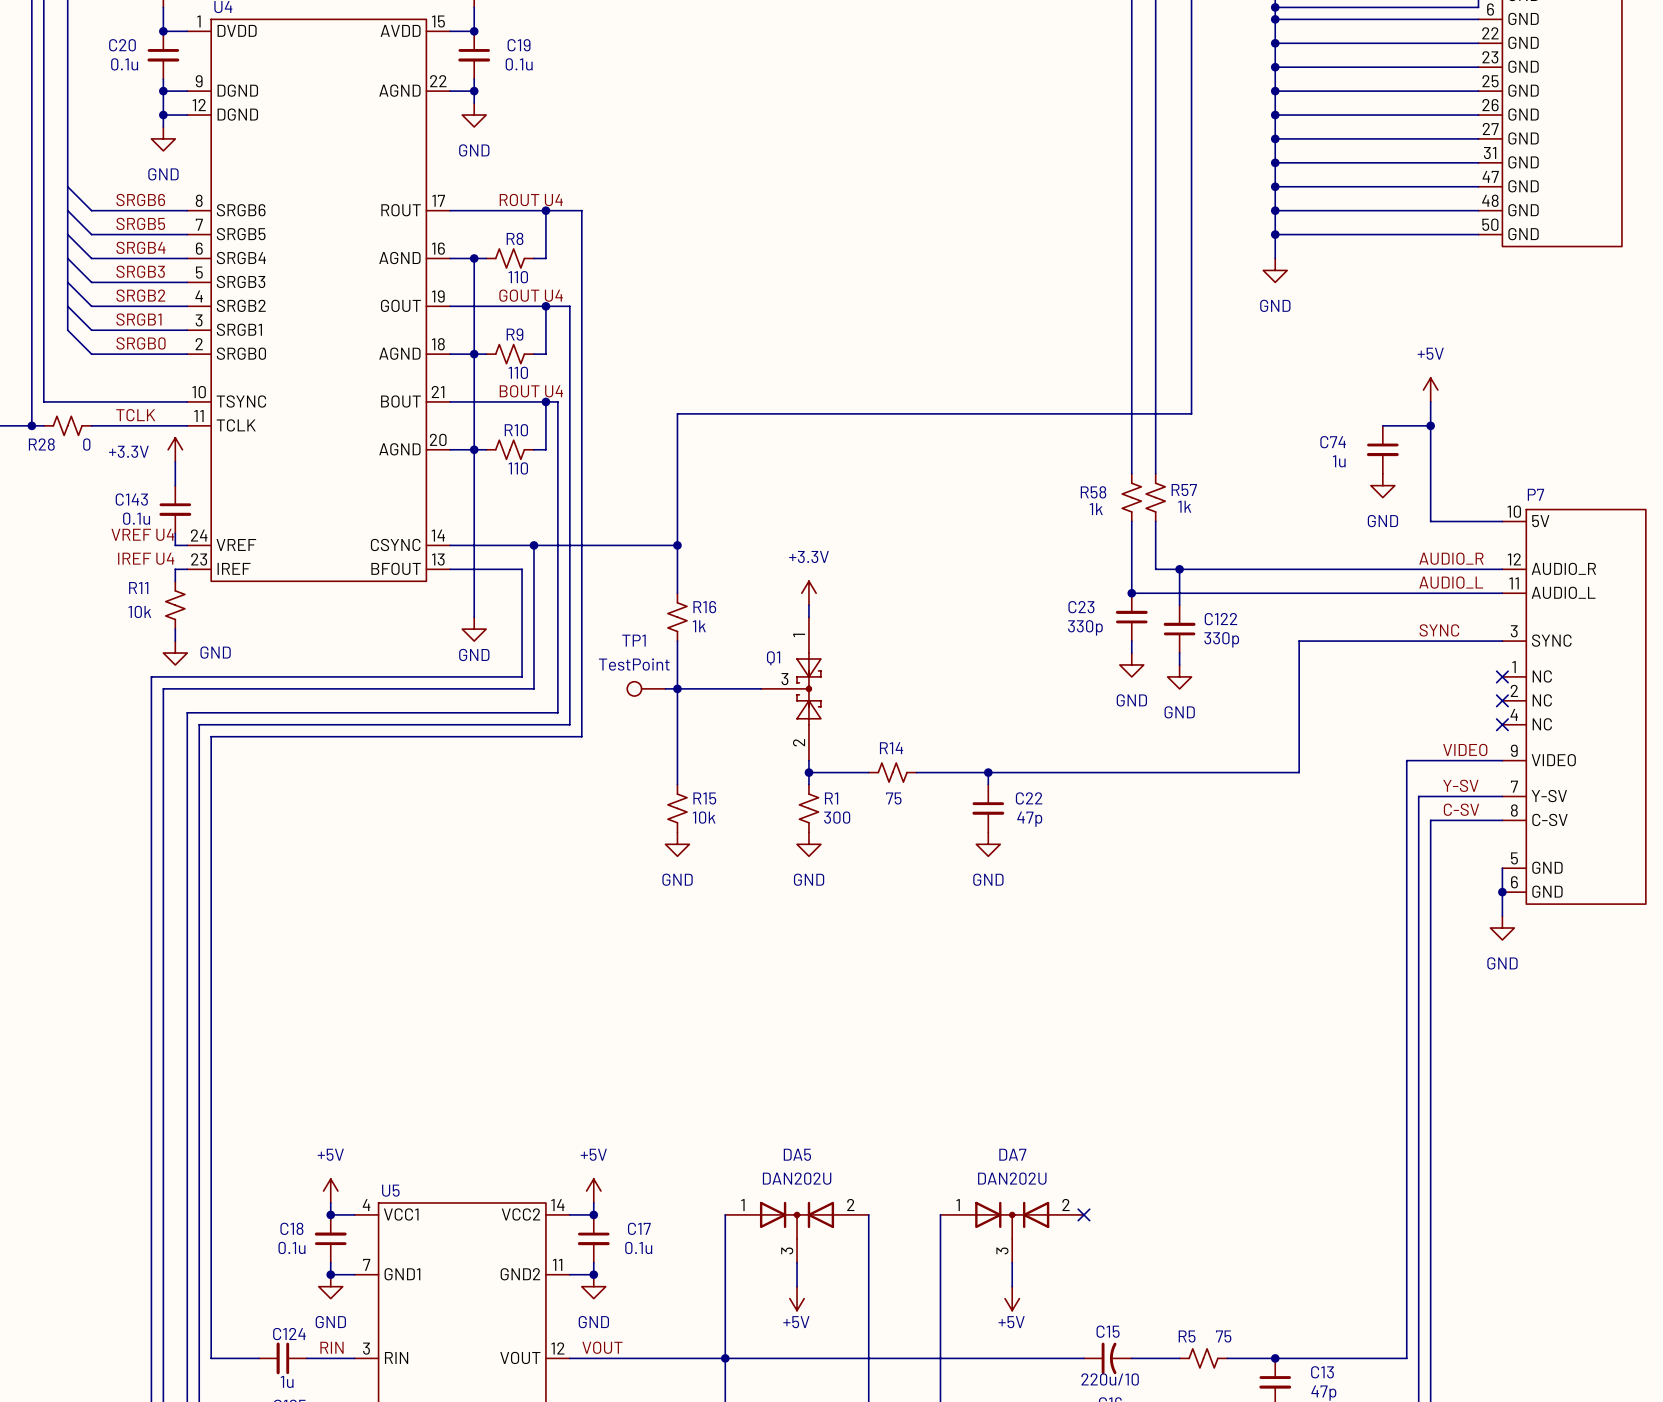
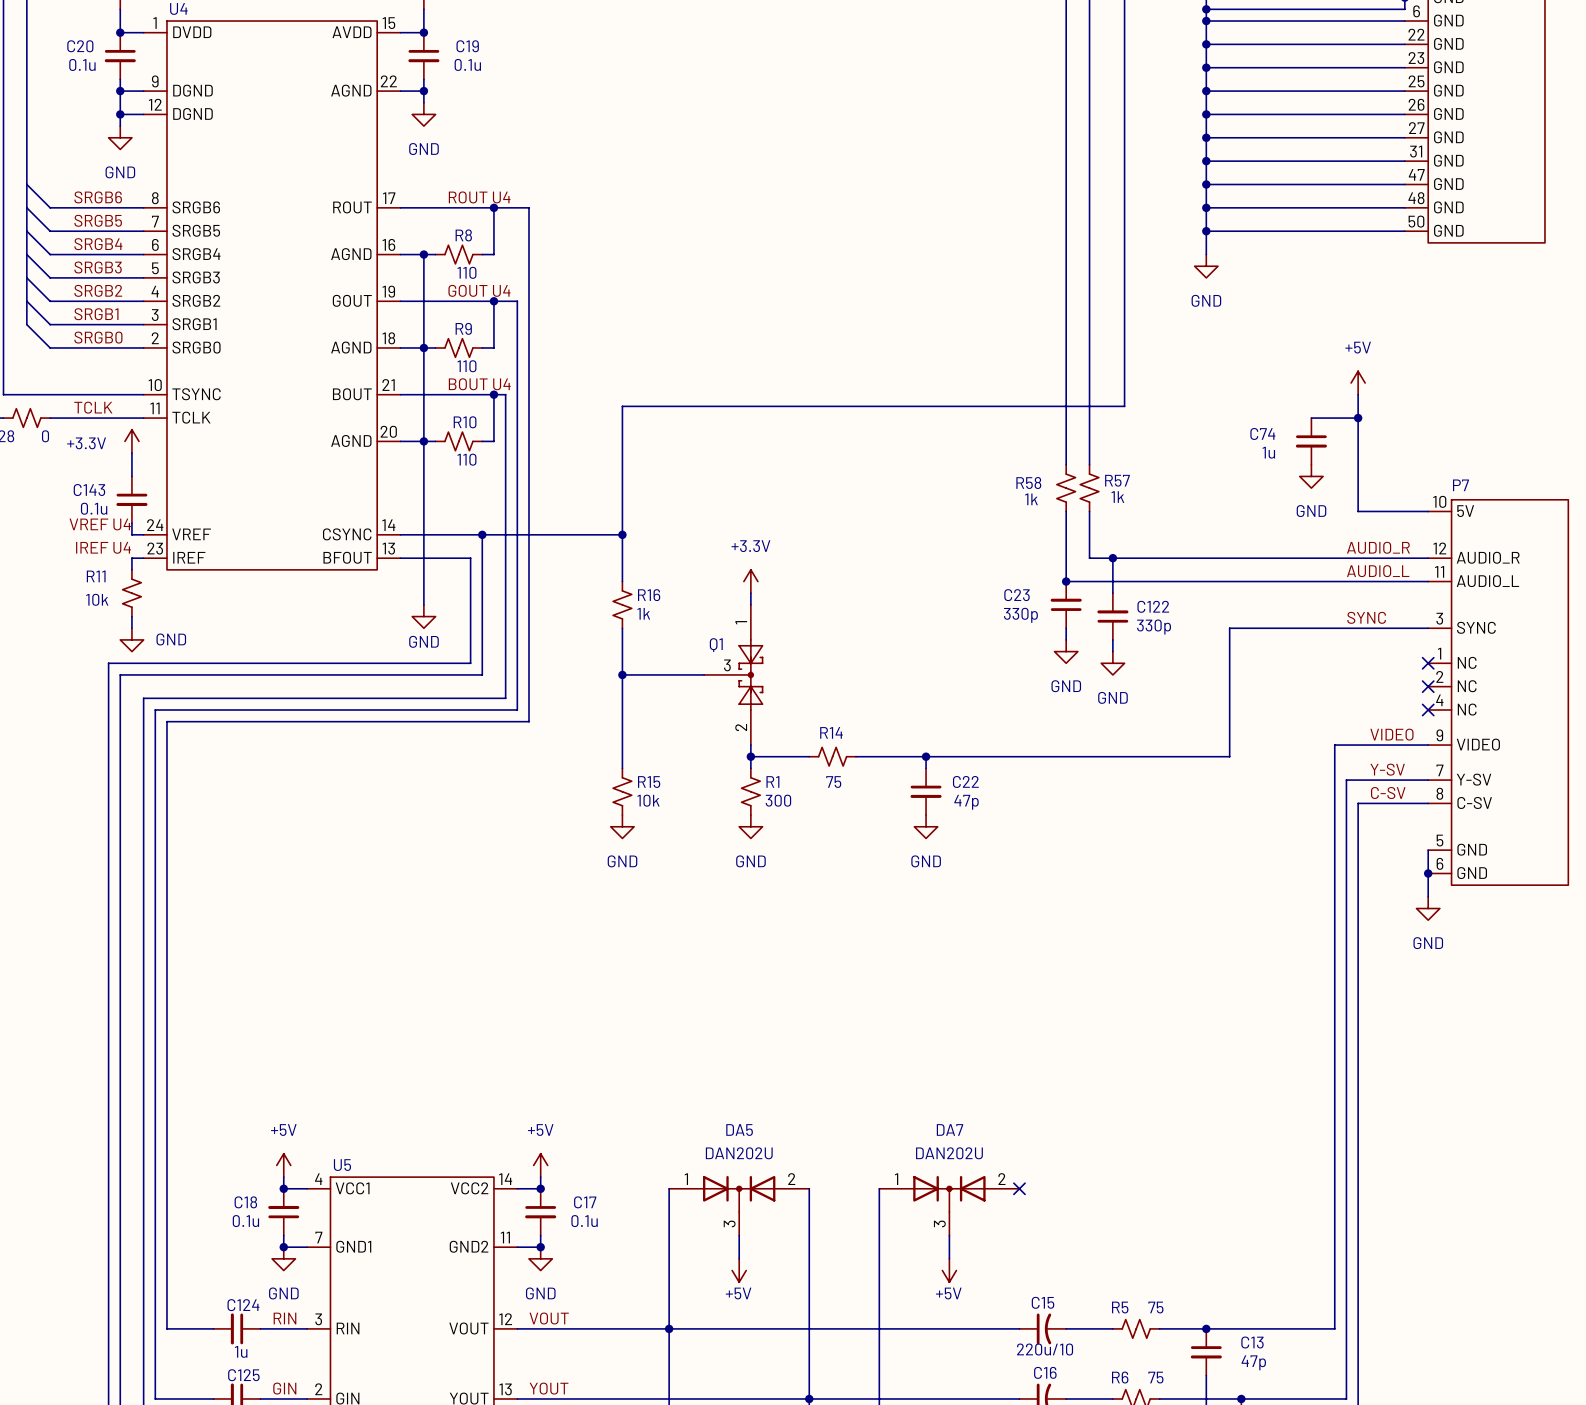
TP1: TestPoint (646, 688) -> none
wire: (665, 688) (677, 688) -> none

